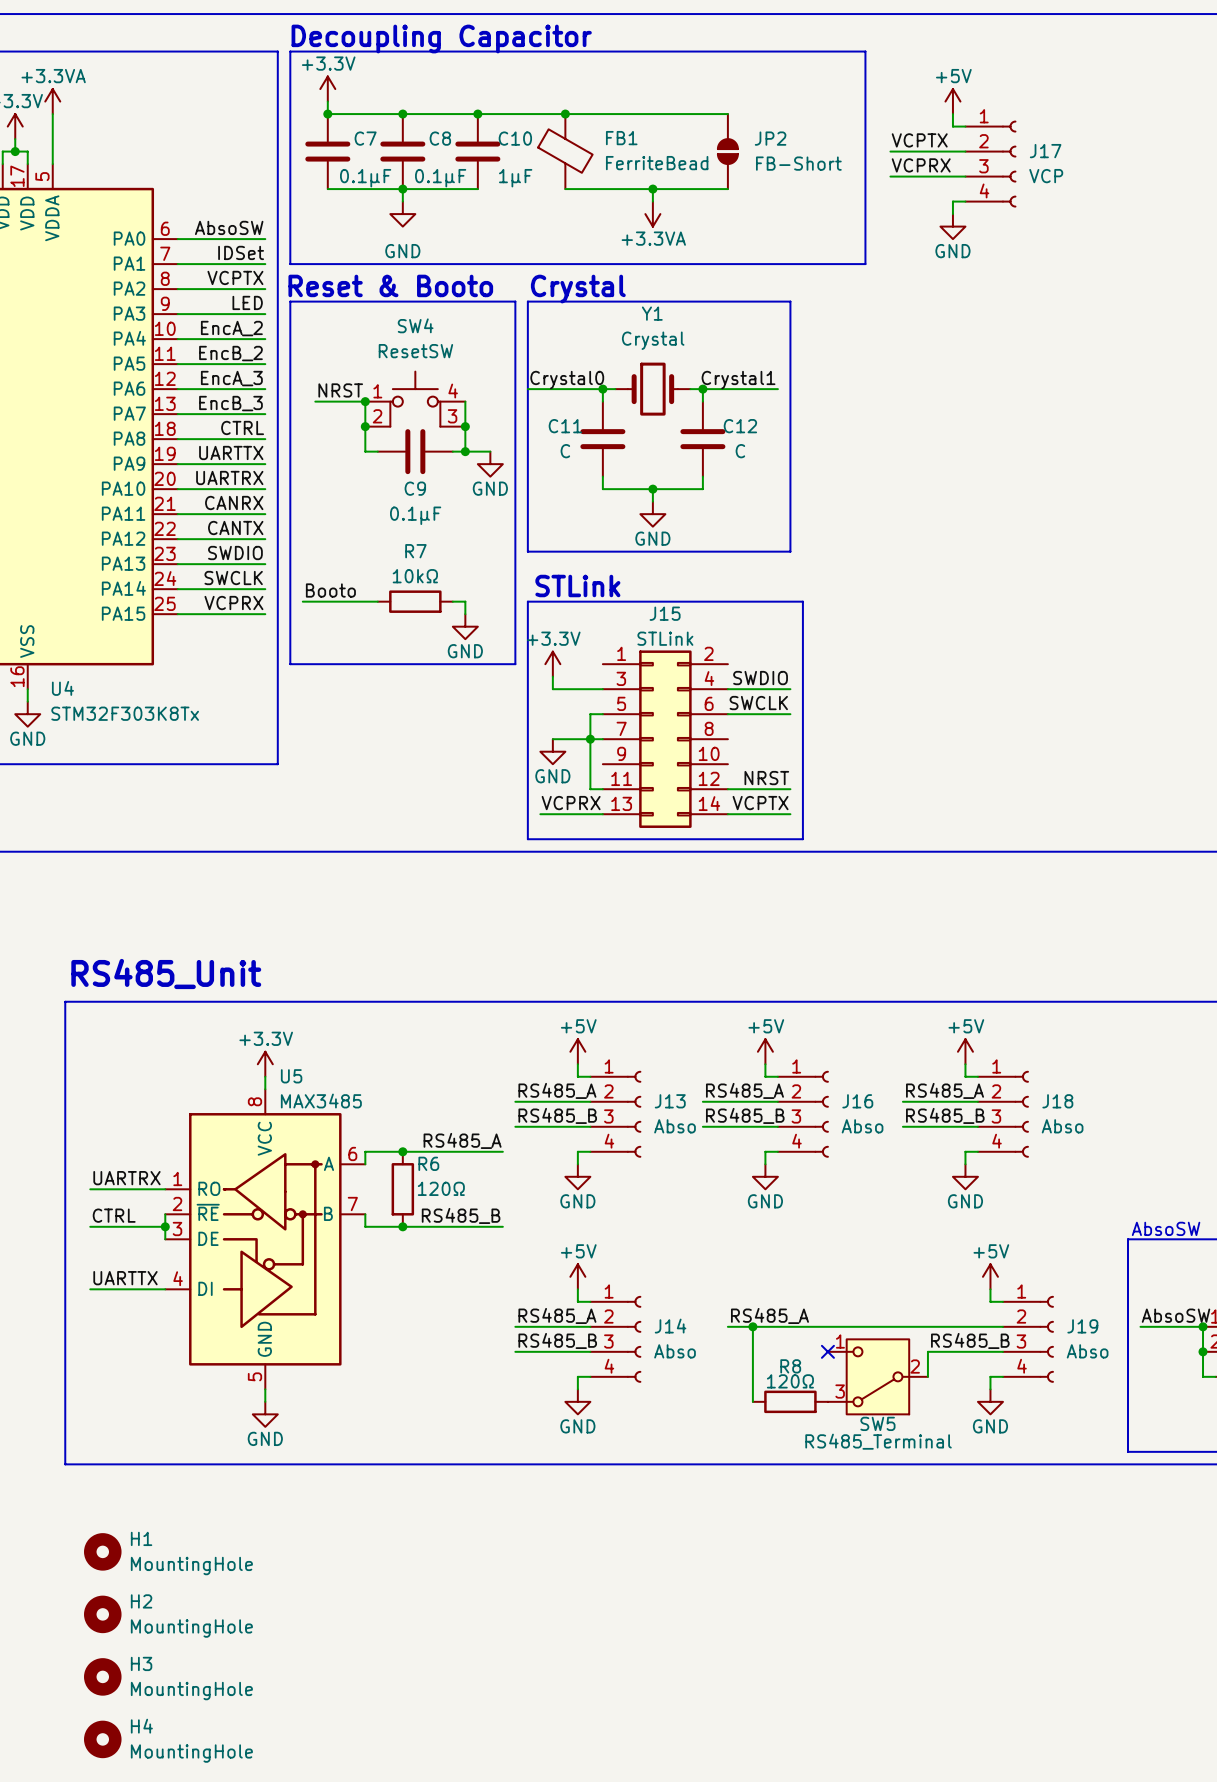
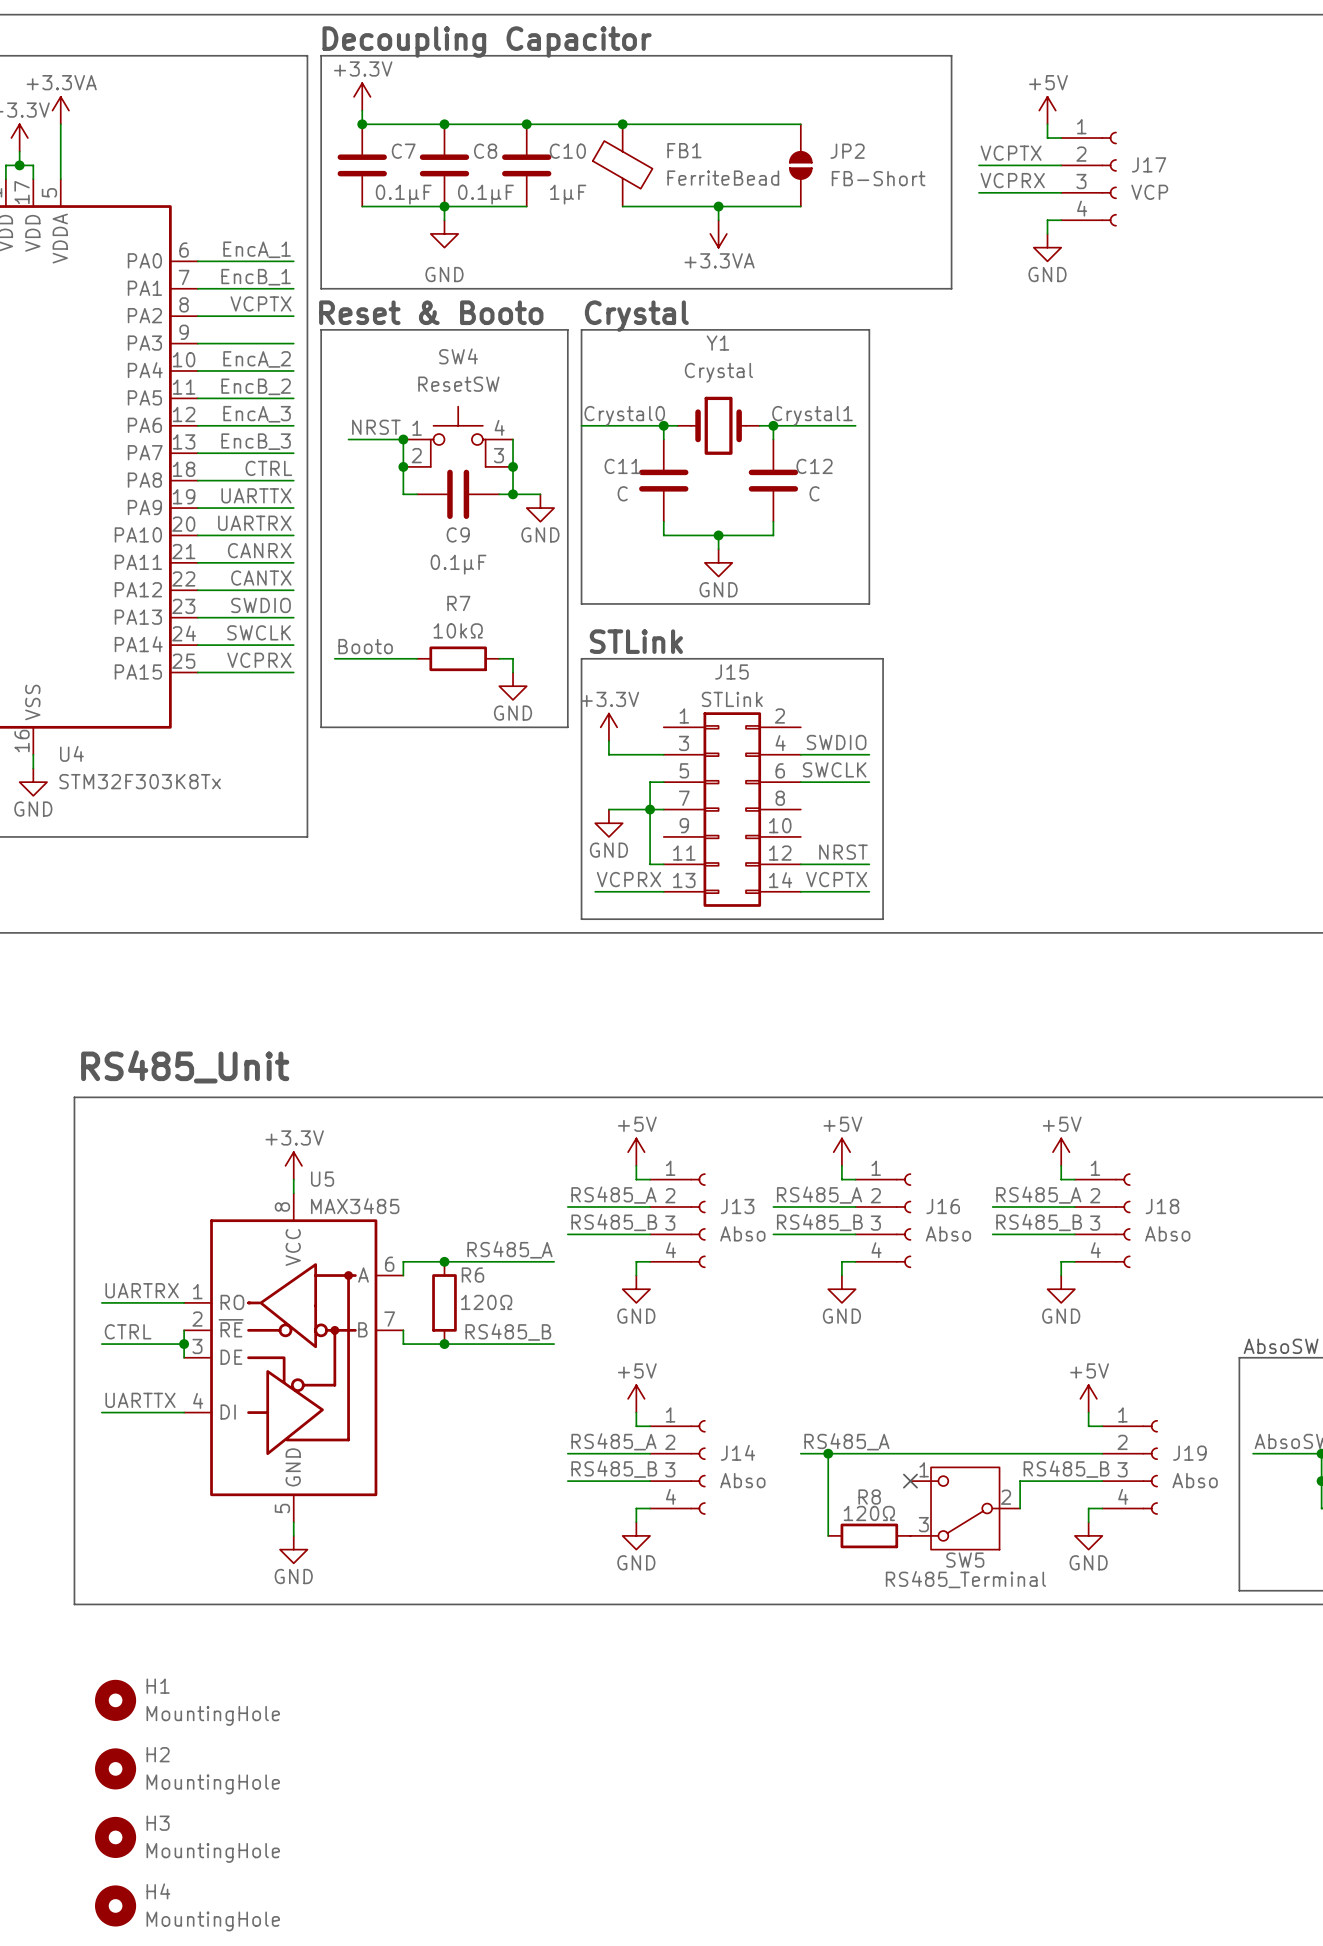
label: AbsoSW (229, 227) -> EncA_1 (257, 249)
label: IDSet (241, 252) -> EncB_1 (256, 277)
label: LED (247, 302) -> none

